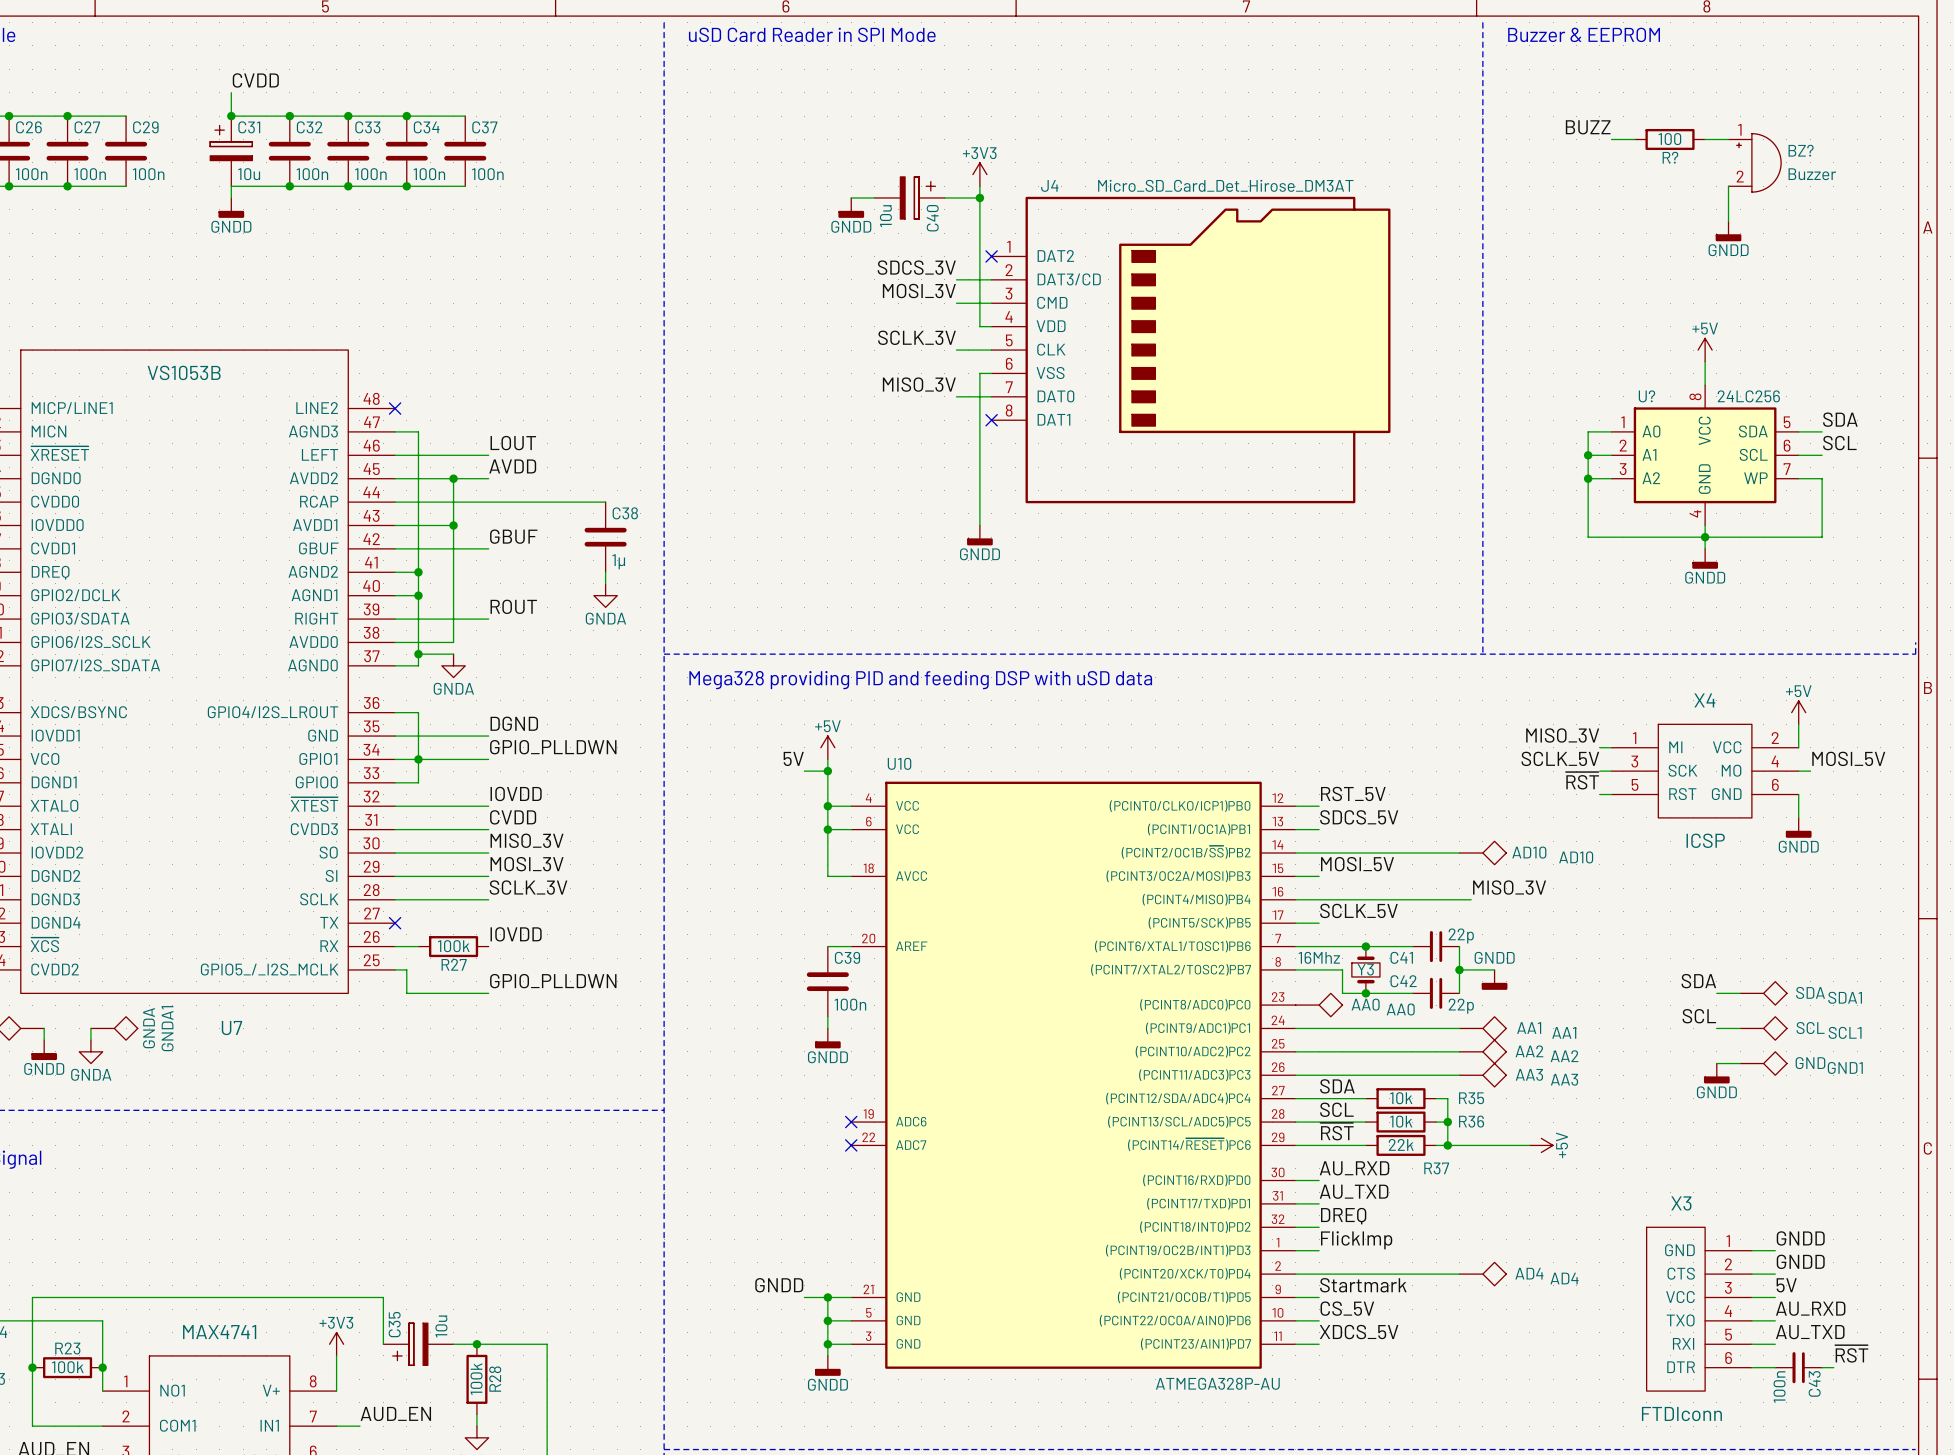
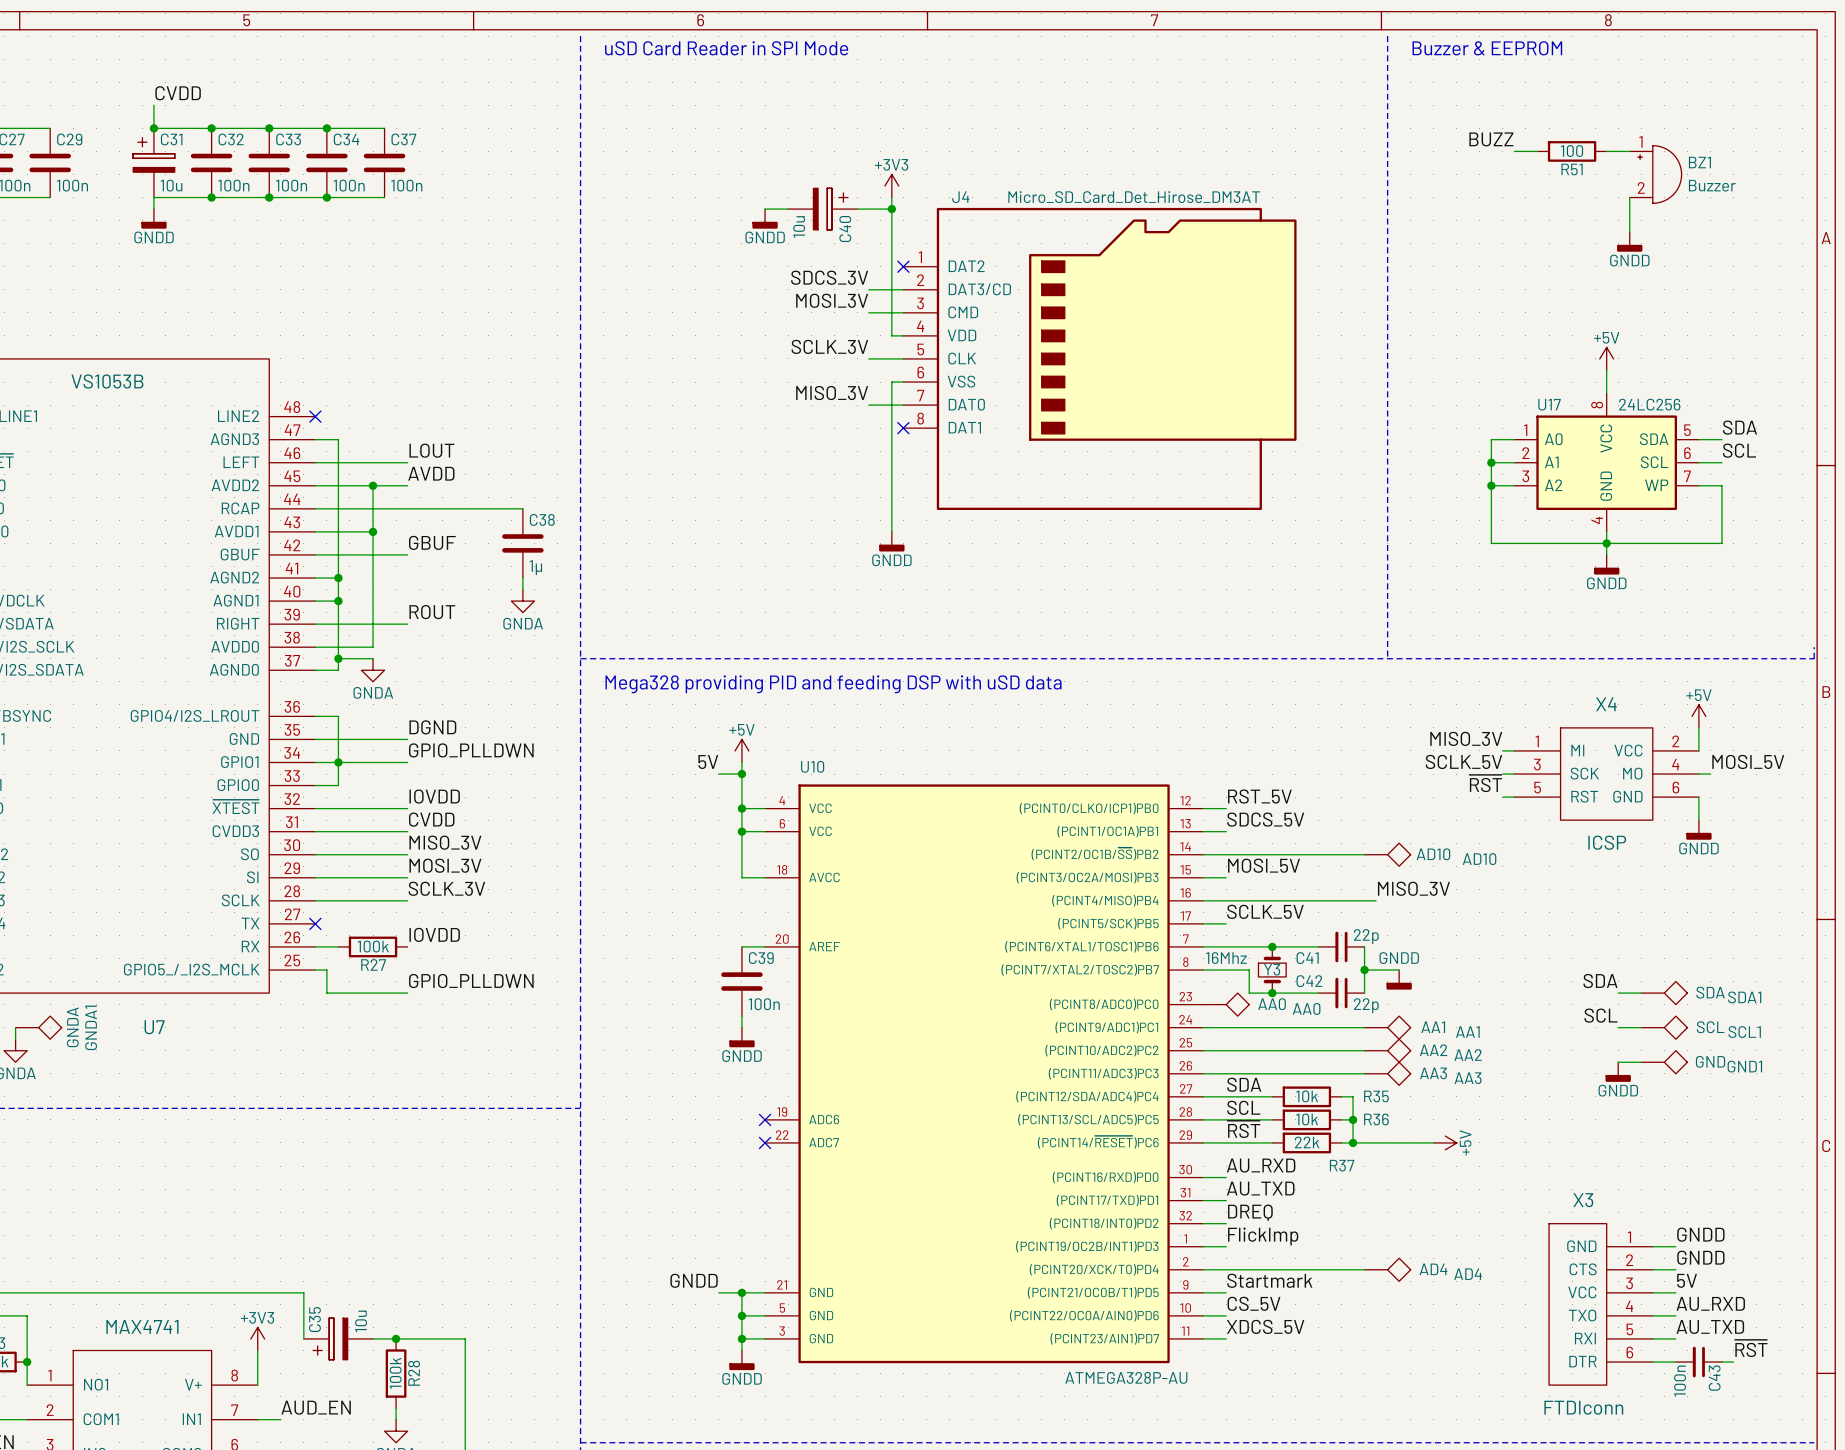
BZ? name: BZ? (1801, 150) -> BZ1 (1699, 162)
R? name: R? (1670, 157) -> R51 (1572, 169)
U? name: U? (1646, 396) -> U17 (1549, 404)

